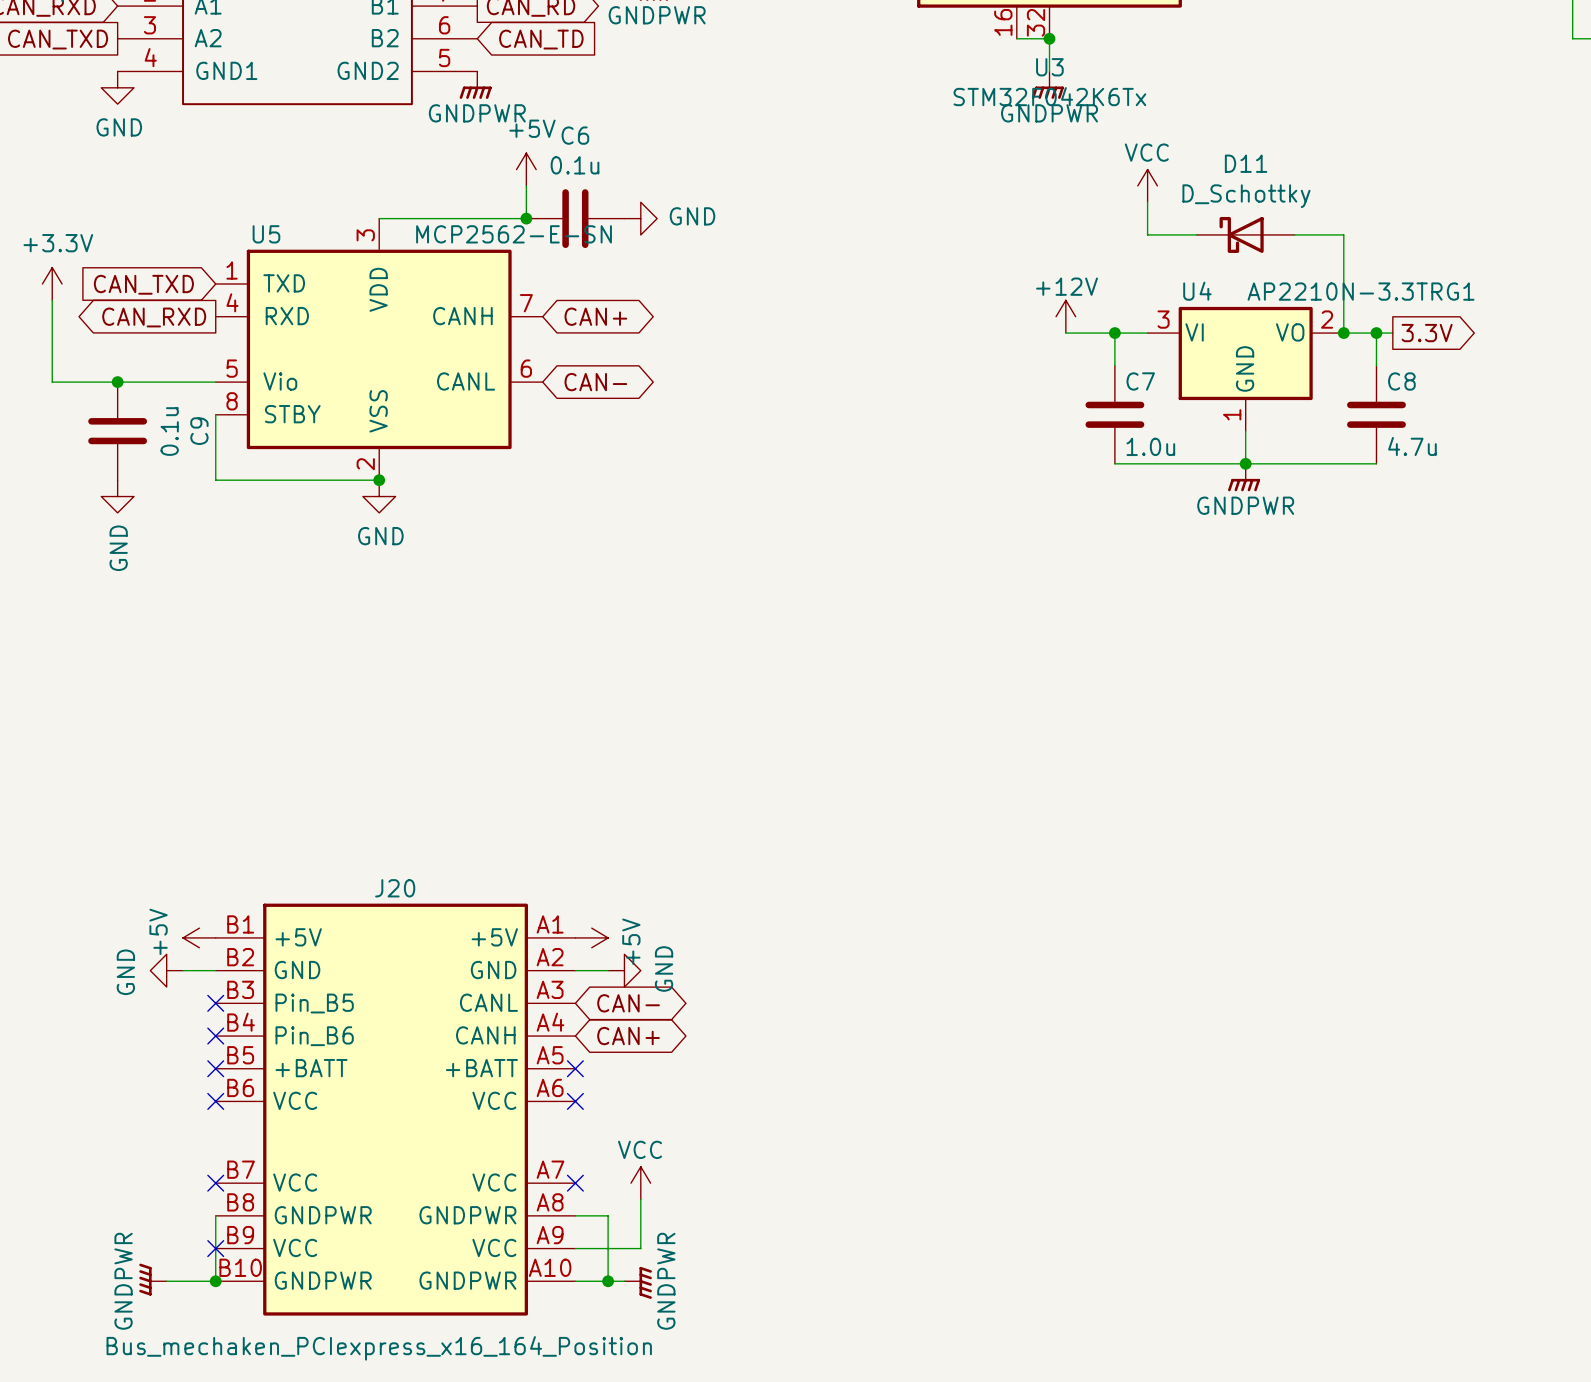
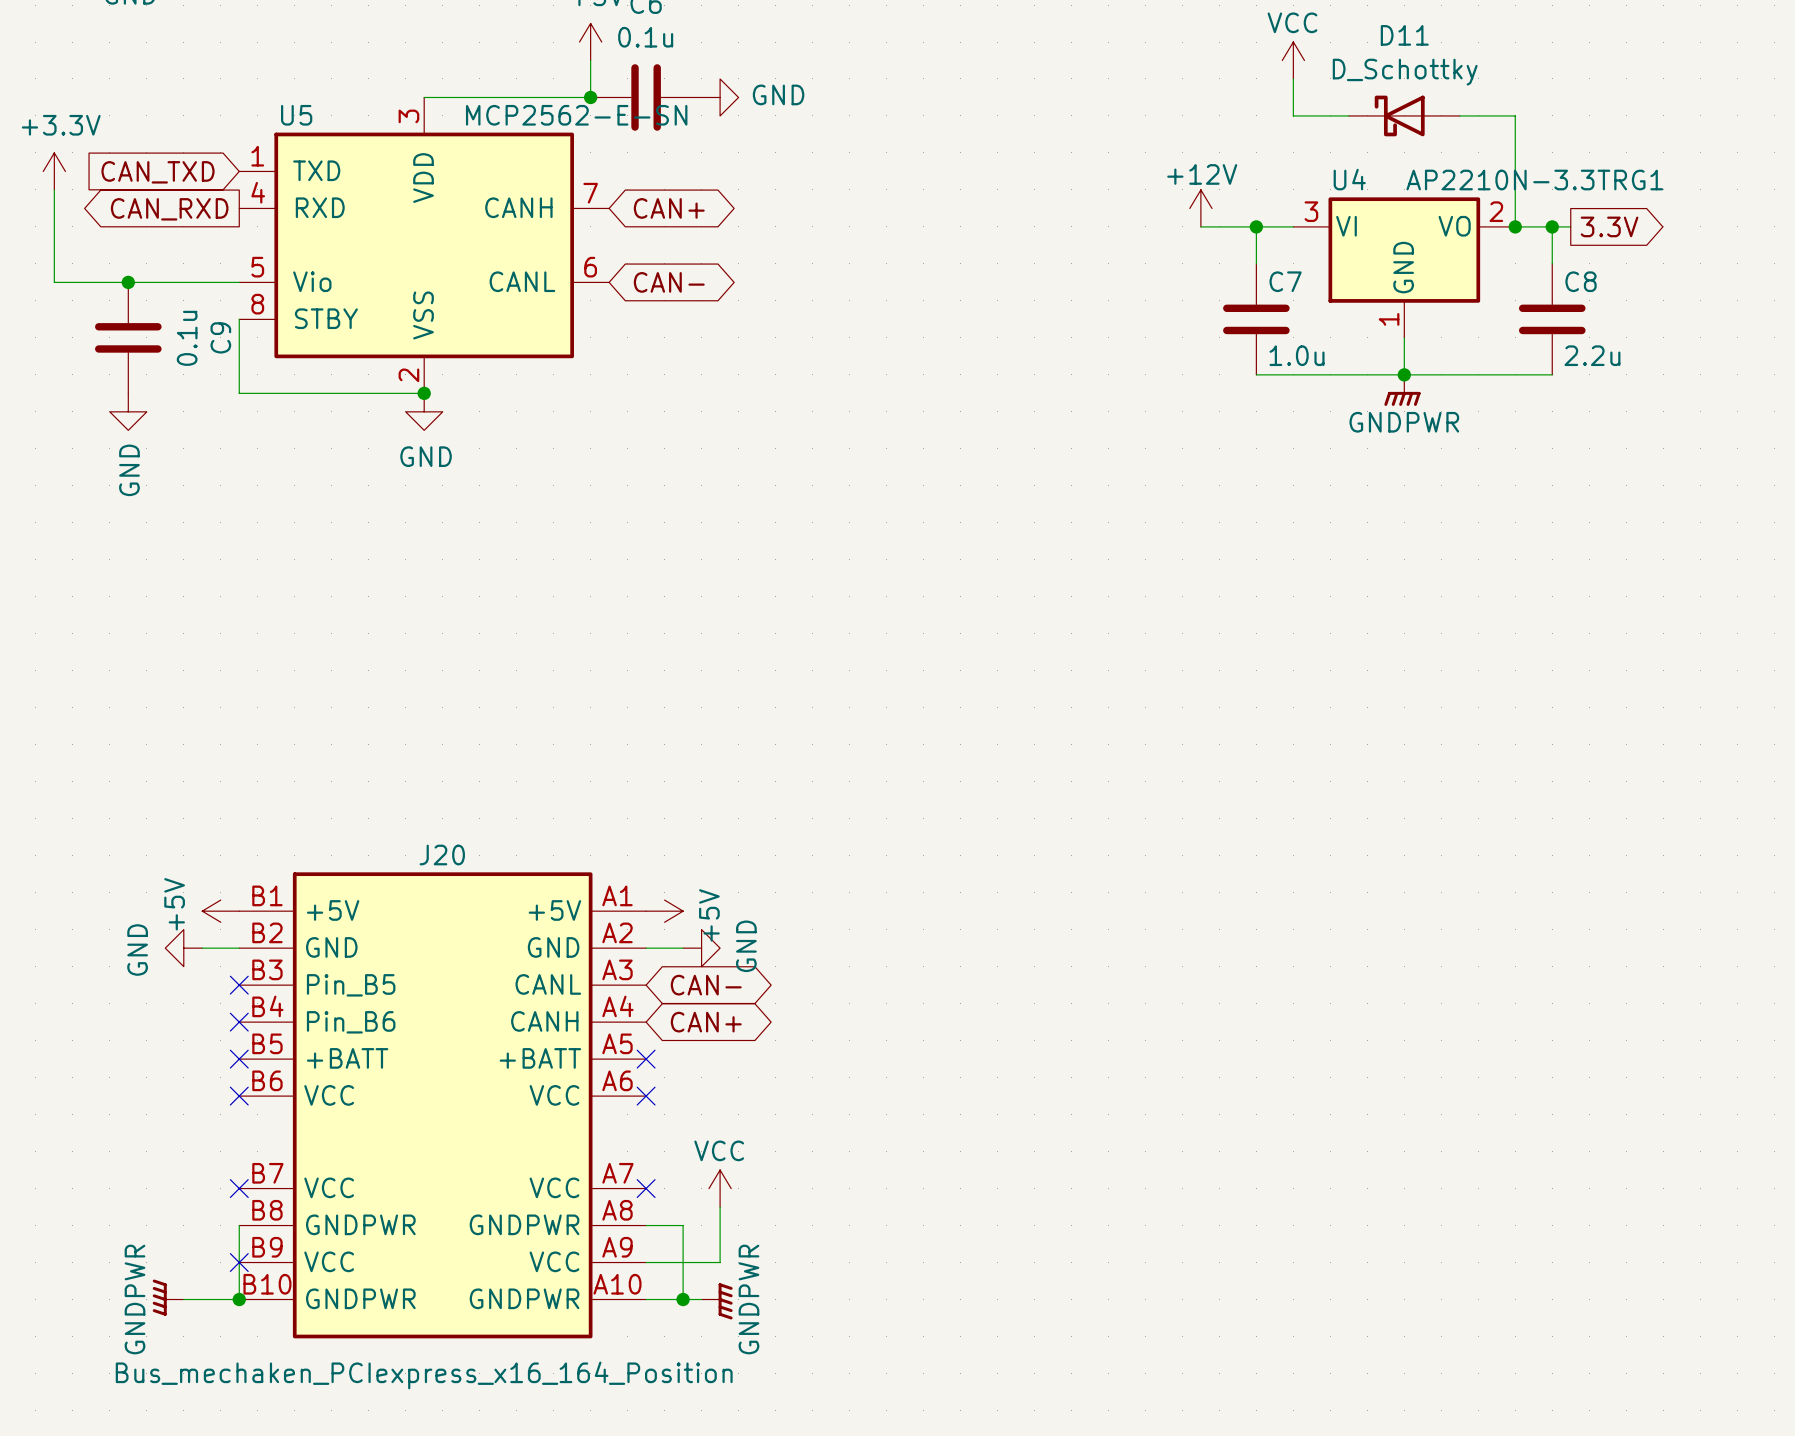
C8 value: 4.7u (1412, 446) -> 2.2u (1592, 355)

